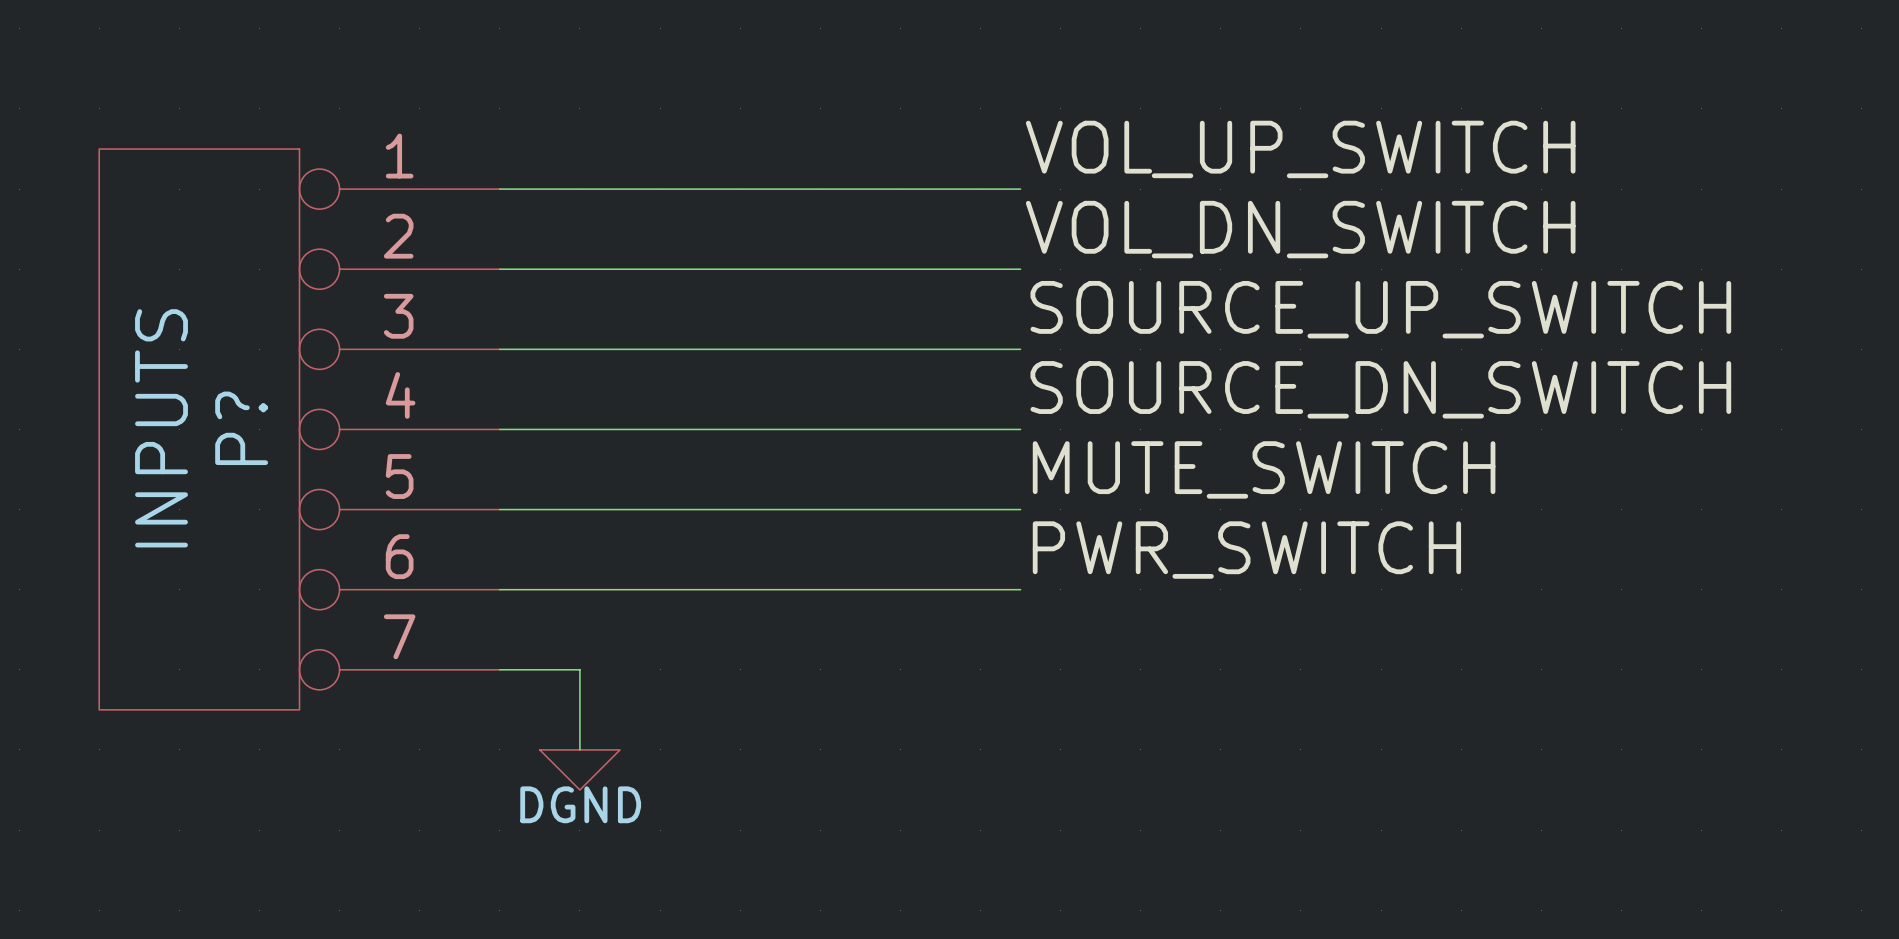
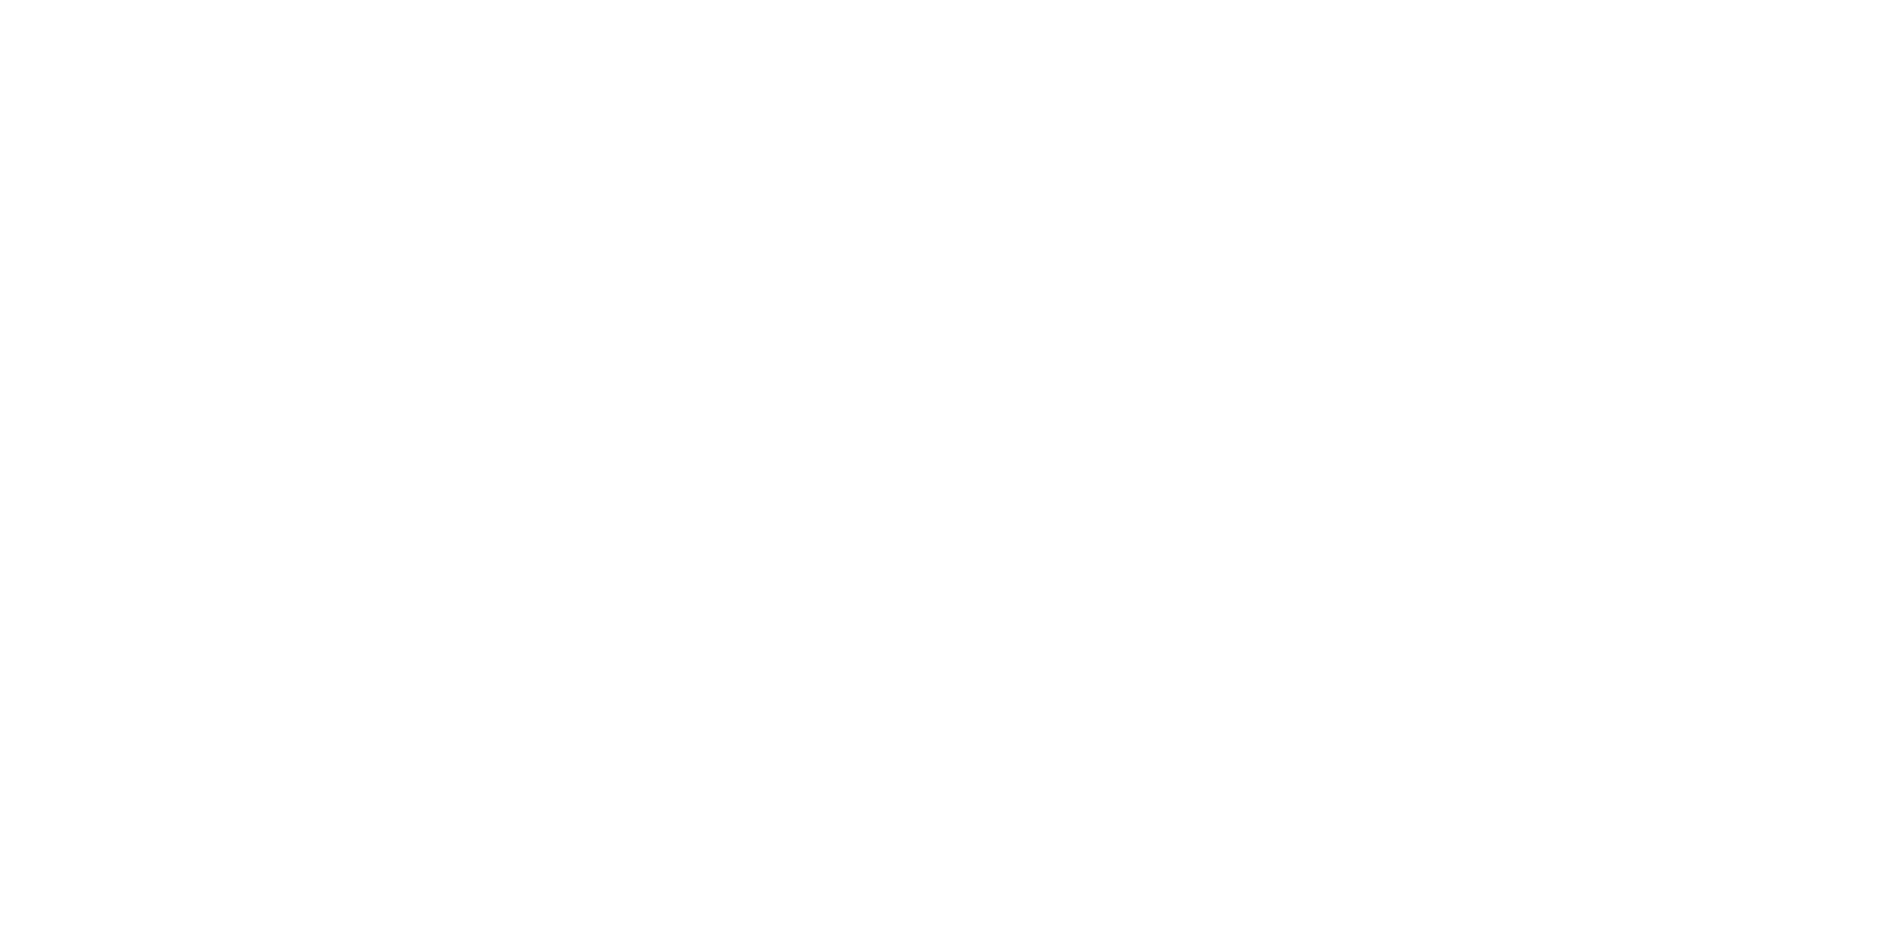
label: VOL_UP_SWITCH (1300, 149) -> none
wire: (499, 189) (1020, 189) -> none
label: VOL_DN_SWITCH (1300, 229) -> none
wire: (499, 269) (1020, 269) -> none
label: SOURCE_UP_SWITCH (1380, 309) -> none
wire: (499, 349) (1020, 349) -> none
label: SOURCE_DN_SWITCH (1380, 389) -> none
P?: INPUTS (299, 429) -> none
wire: (499, 429) (1020, 429) -> none
label: MUTE_SWITCH (1264, 469) -> none
wire: (499, 509) (1020, 509) -> none
label: PWR_SWITCH (1246, 550) -> none
wire: (499, 589) (1020, 589) -> none
wire: (499, 669) (579, 669) (579, 749) -> none
power symbol: DGND (579, 769) -> none

